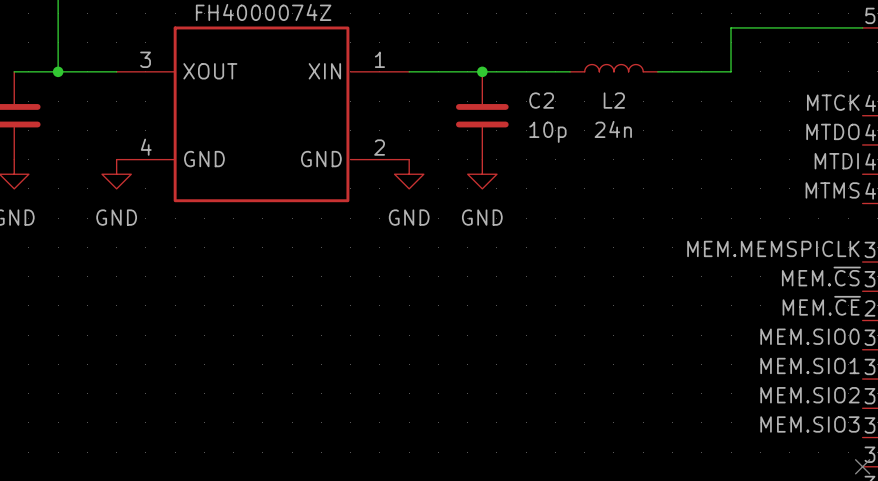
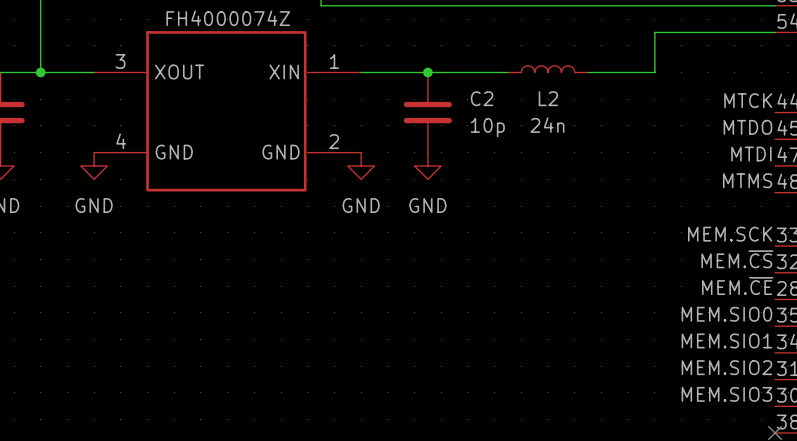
label: MEM.MEMSPICLK (773, 248) -> MEM.SCK (730, 234)

